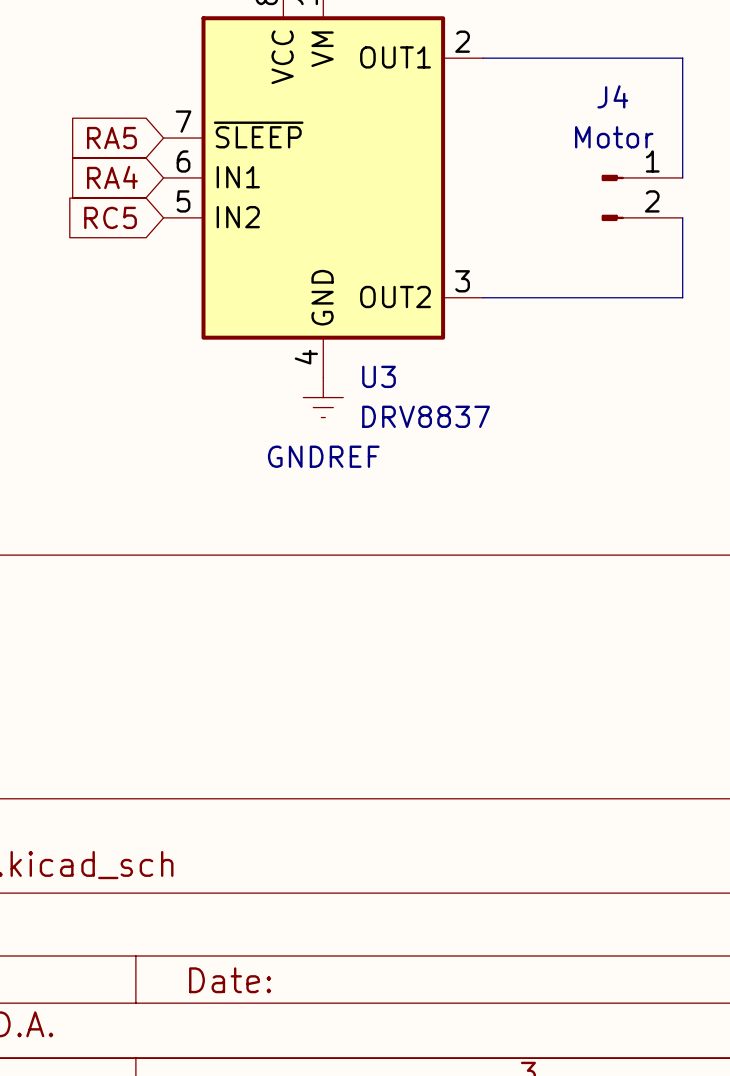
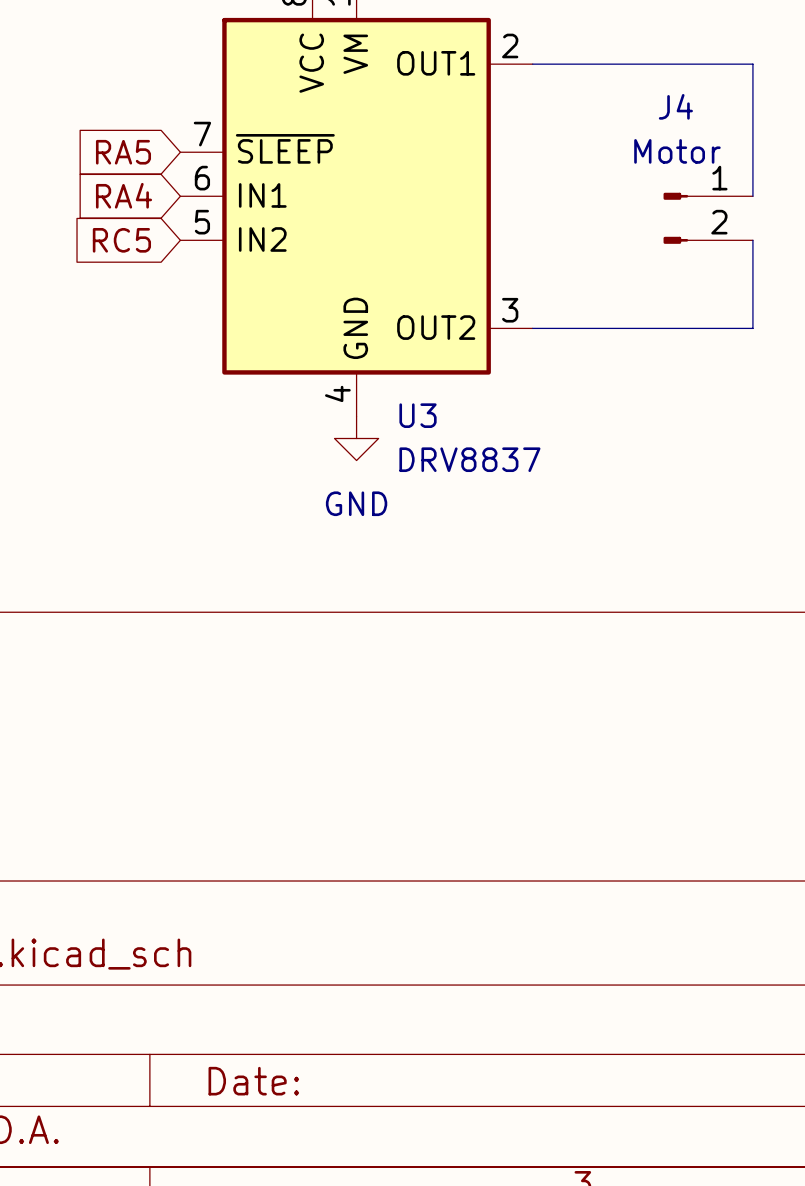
power symbol: GNDREF (323, 397) -> GND (356, 438)

